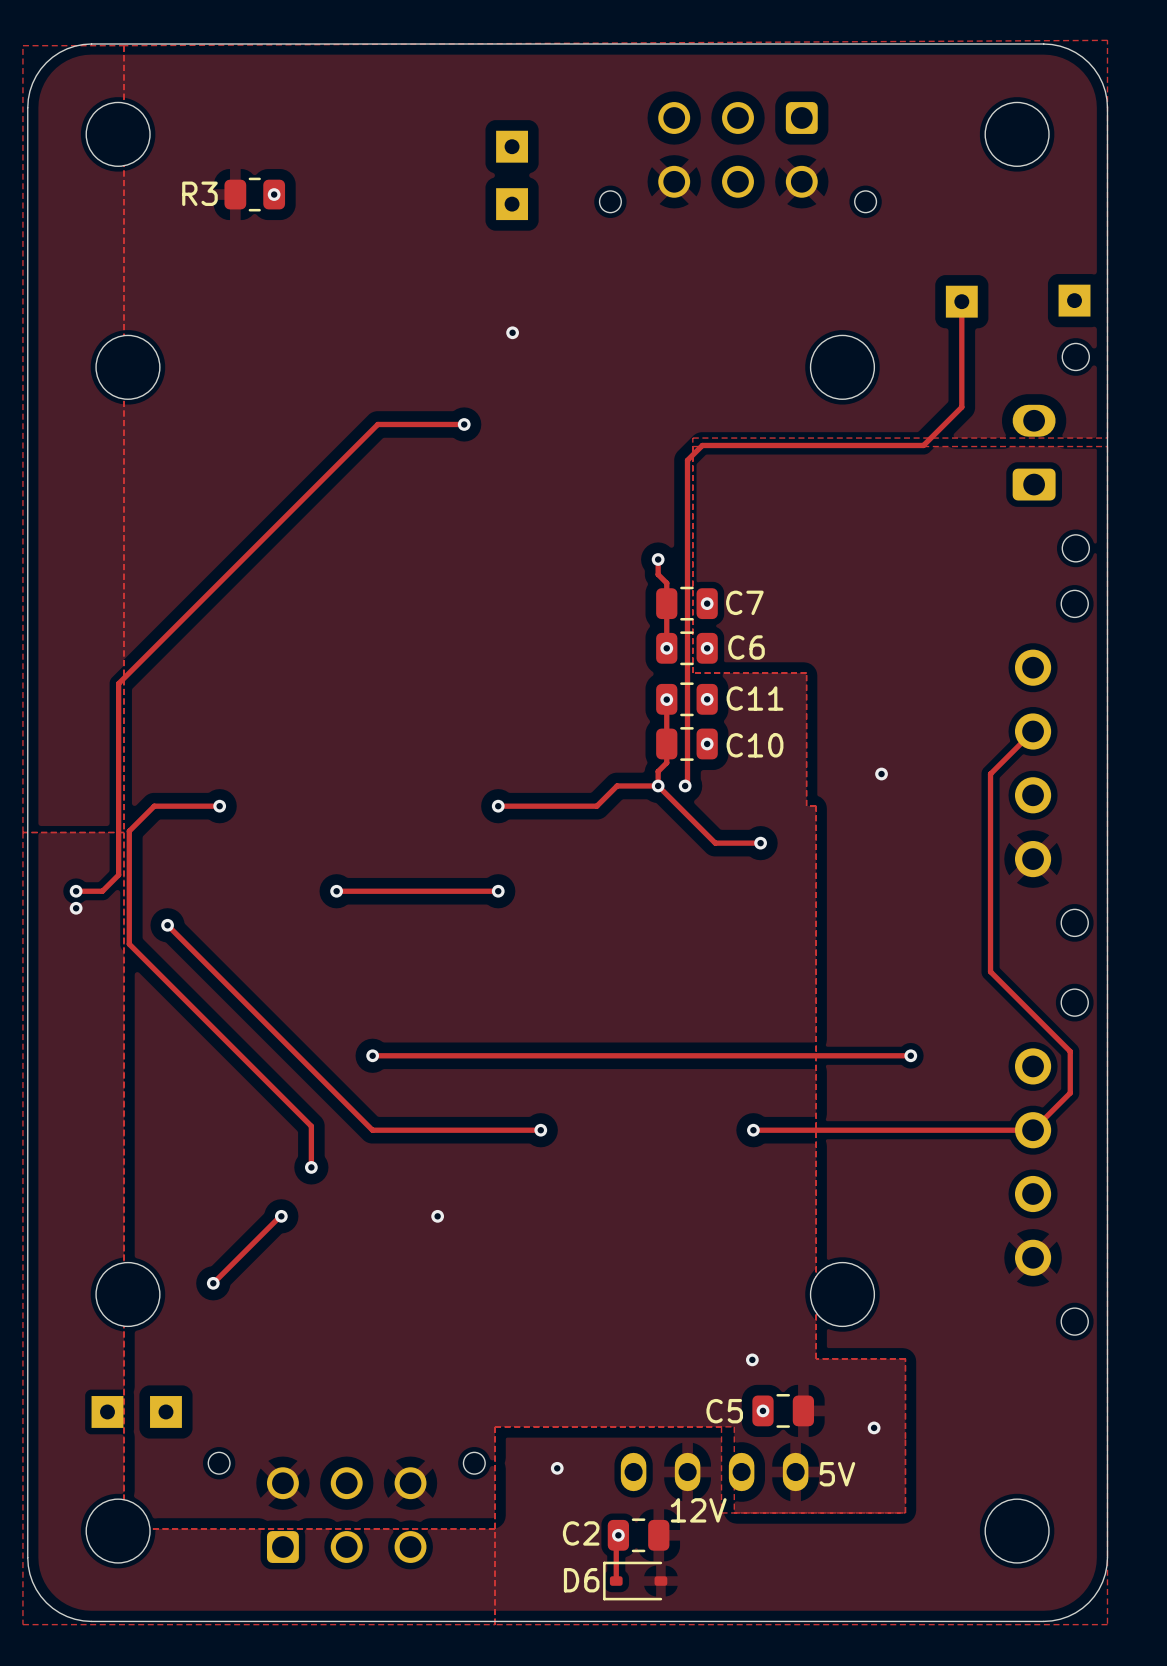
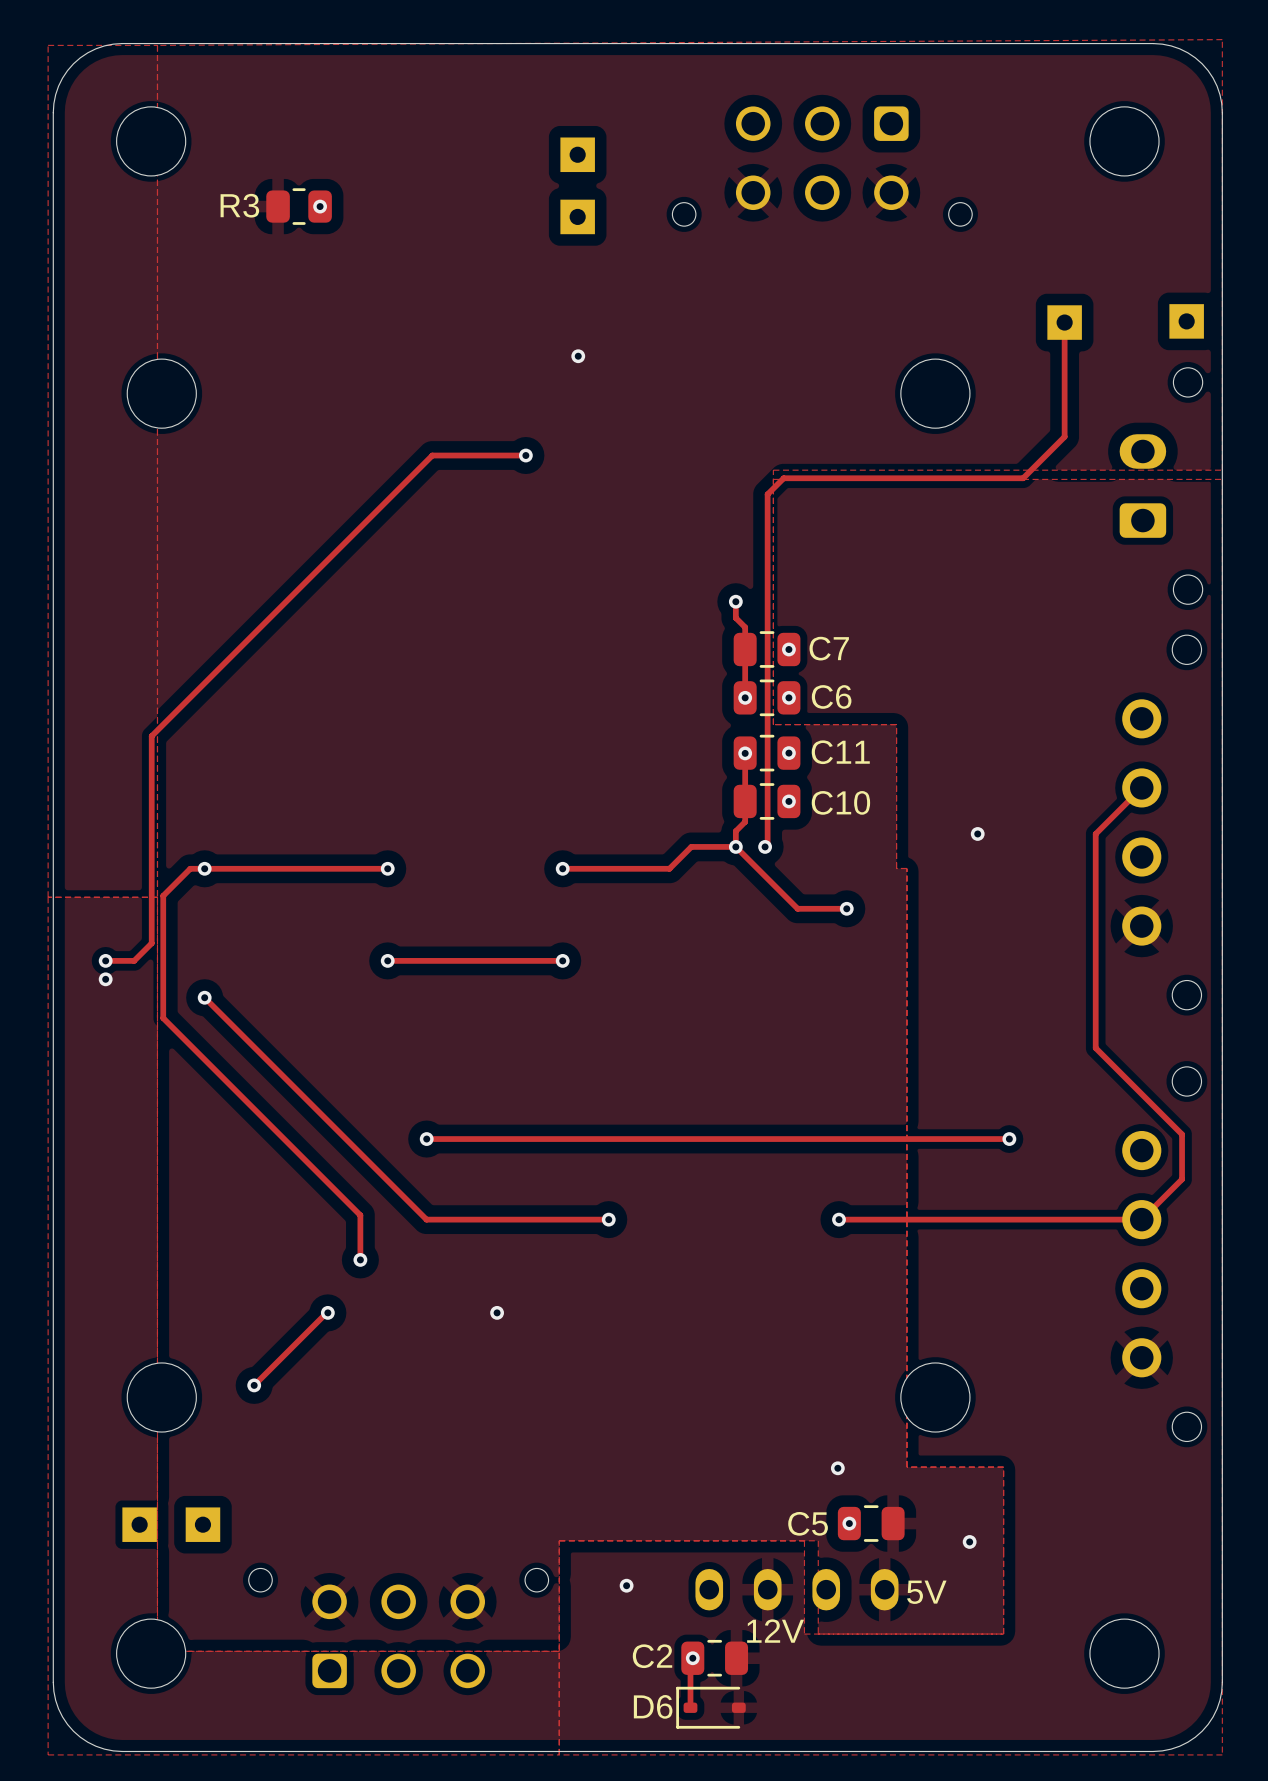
track: none -> (261, 868) (387, 868)
via position: (219, 806) -> (204, 868)
via: none -> (387, 868)

